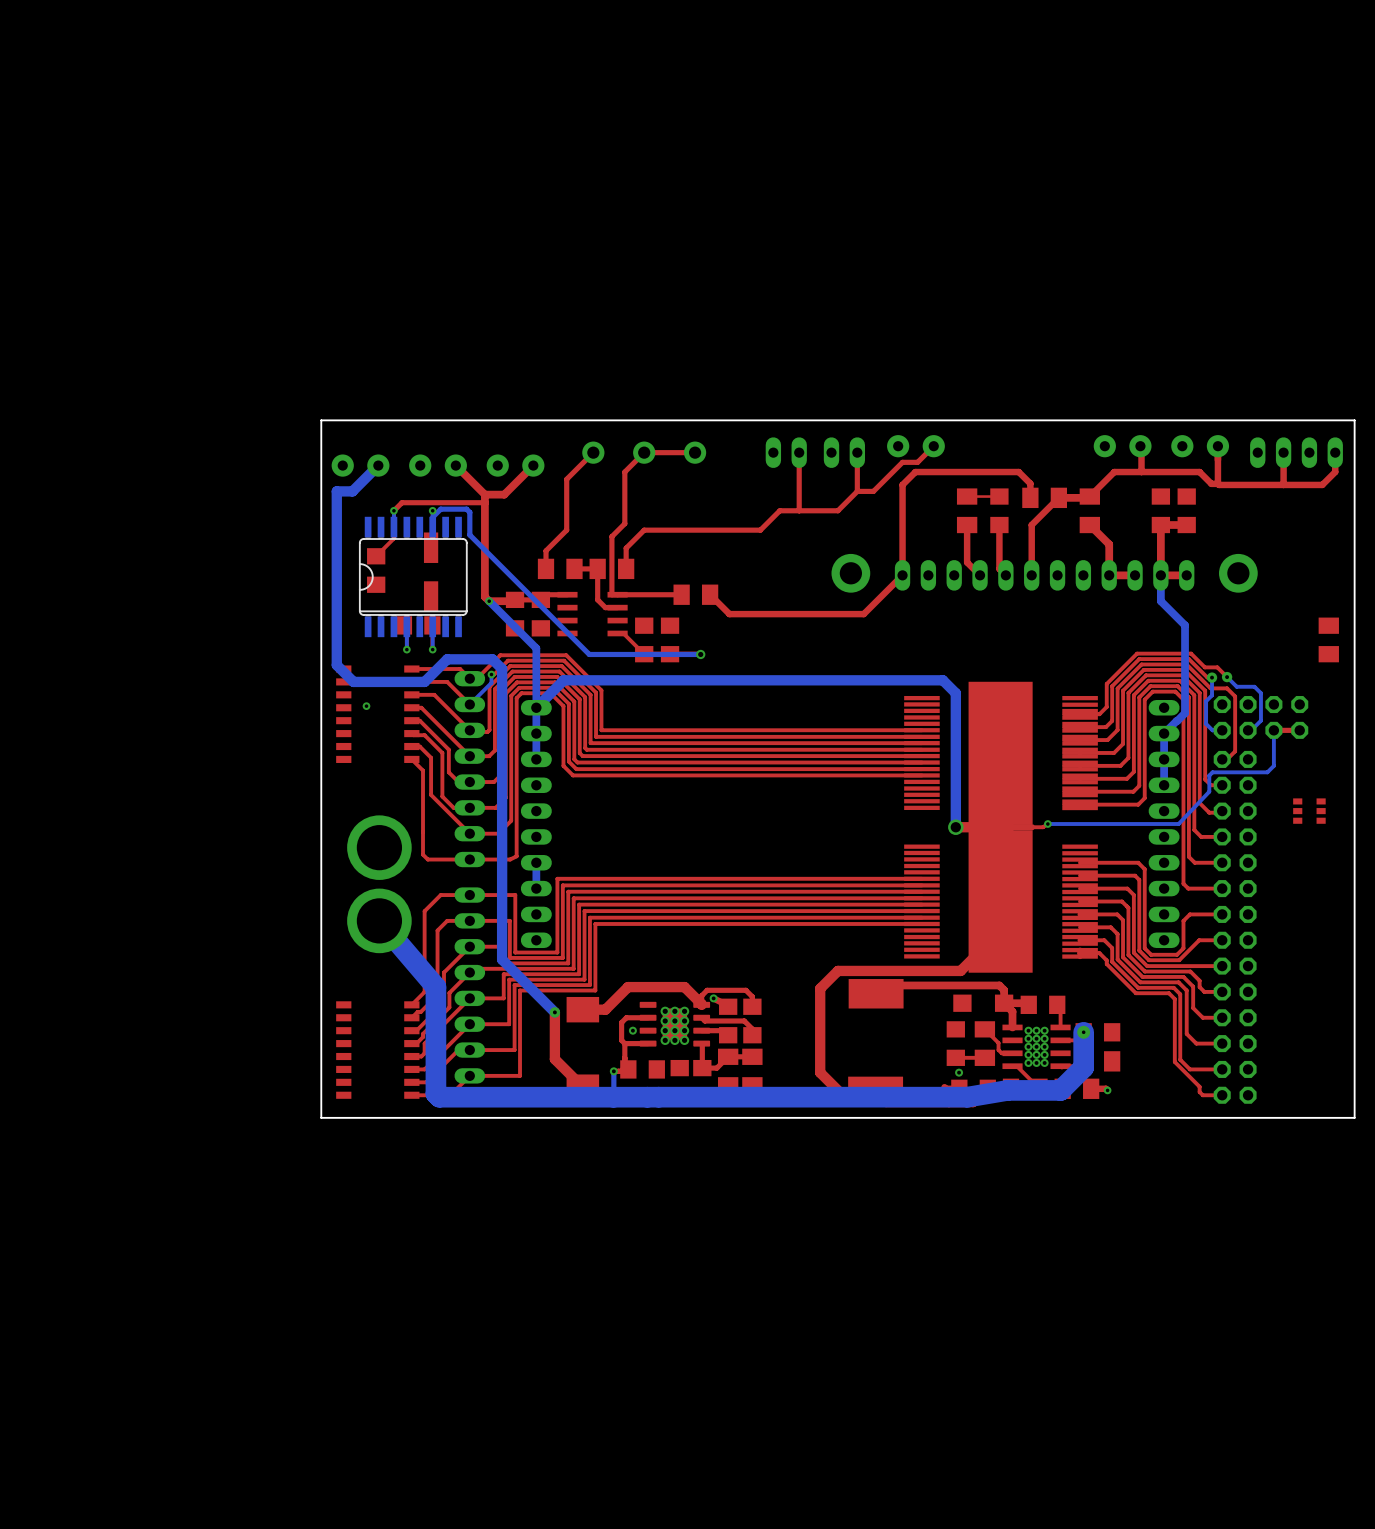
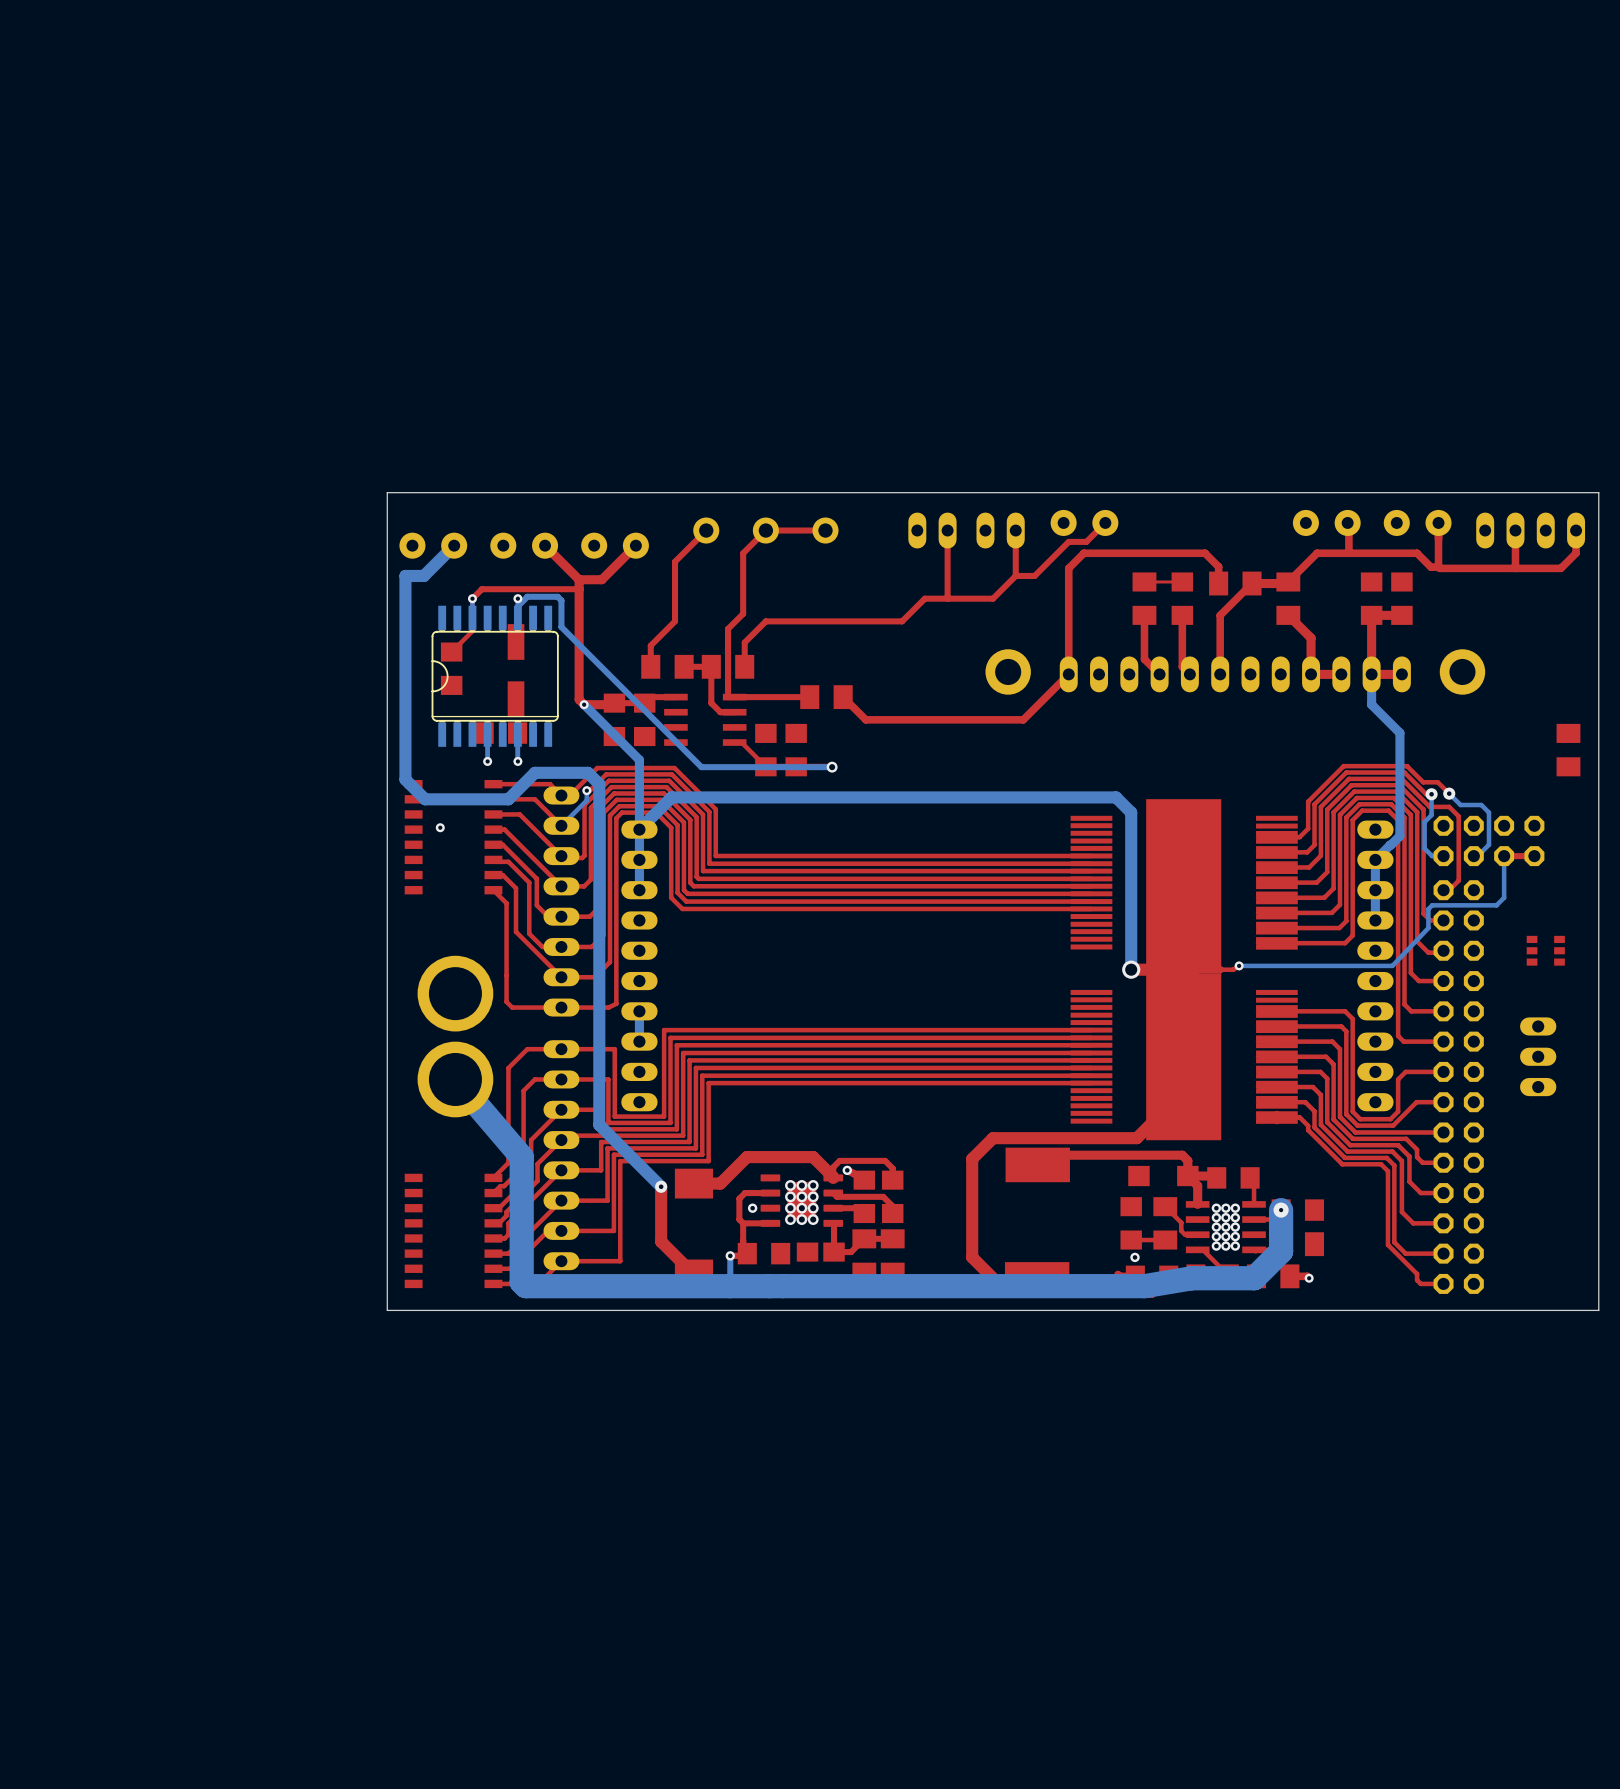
top track: none -> (1276, 1011) (1258, 1011)
top track: none -> (1276, 1026) (1258, 1026)
top track: none -> (1276, 1041) (1258, 1041)
top track: none -> (1276, 1056) (1258, 1056)
part: none -> (1538, 1056)
top track: none -> (1276, 1071) (1258, 1071)
top track: none -> (1276, 1087) (1258, 1087)
top track: none -> (1276, 1102) (1258, 1102)
top track: none -> (1276, 1117) (1258, 1117)

